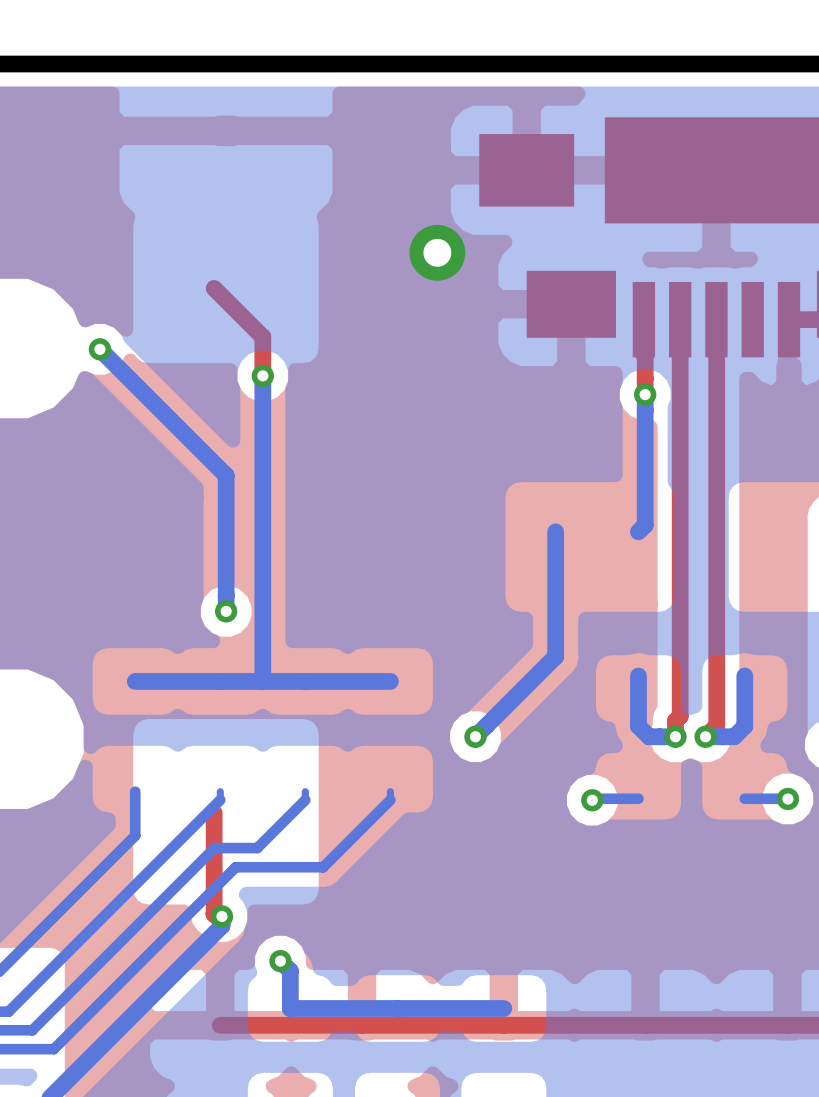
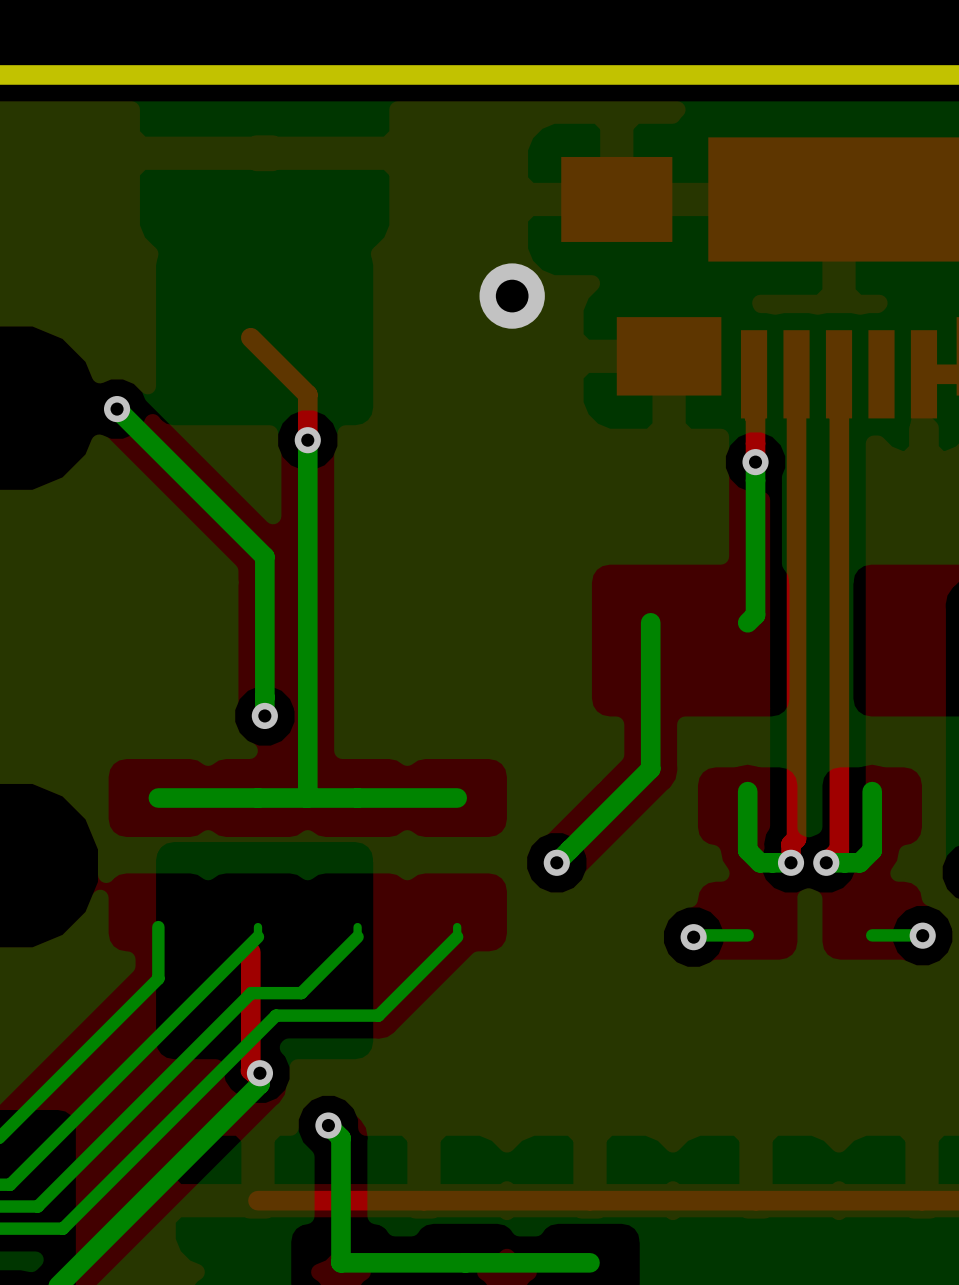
bottom track: (290, 970) (290, 1008) (503, 1008) -> (340, 1137) (340, 1262) (590, 1262)

